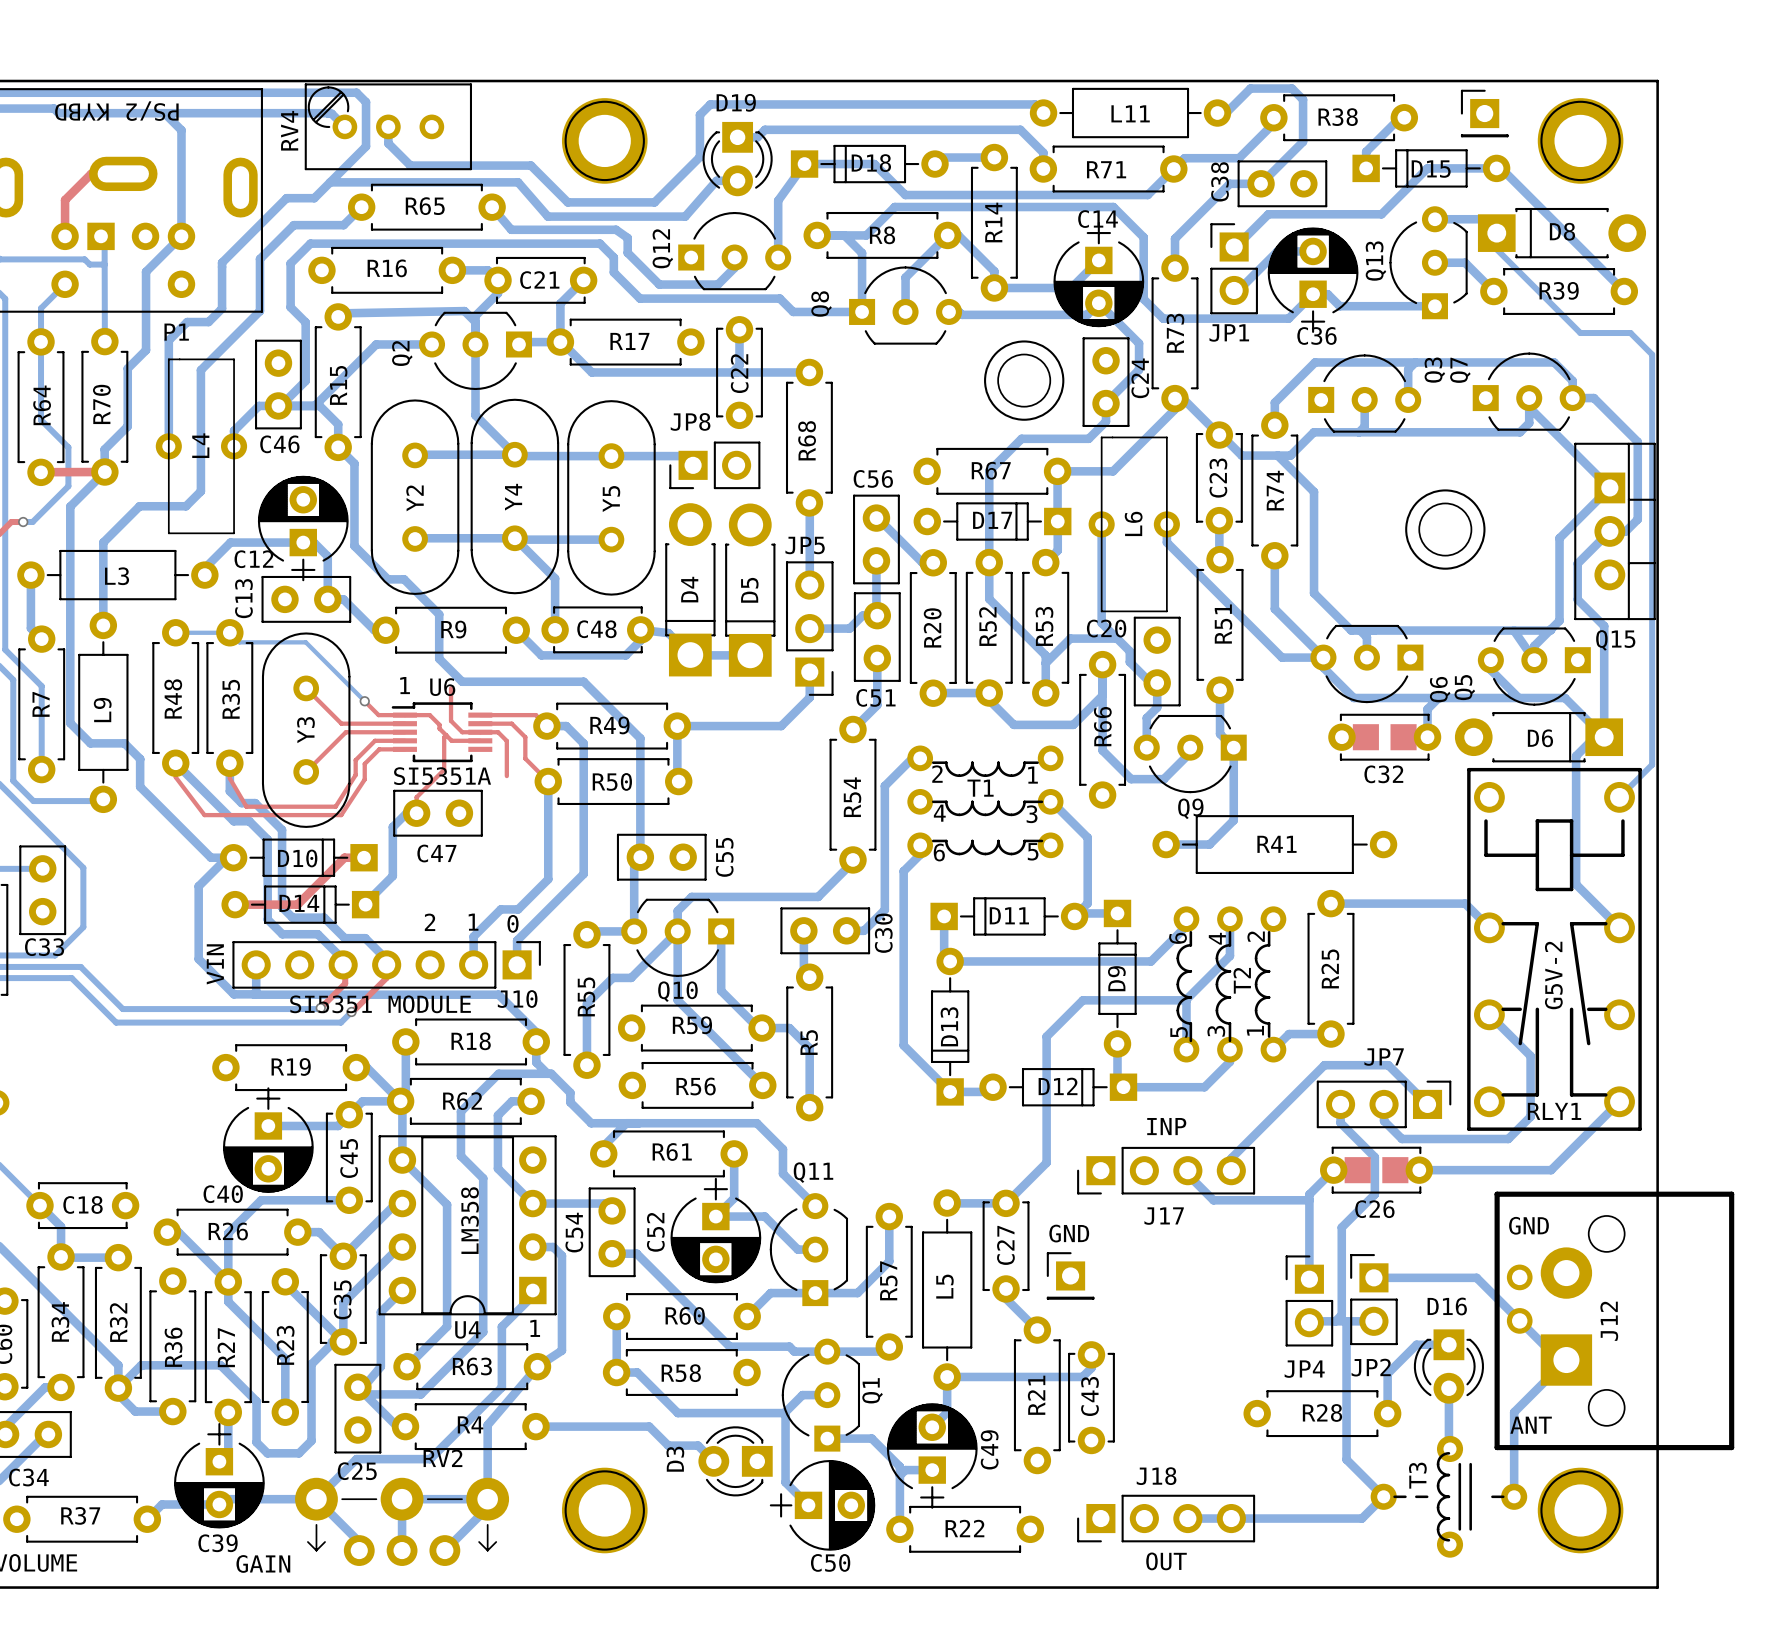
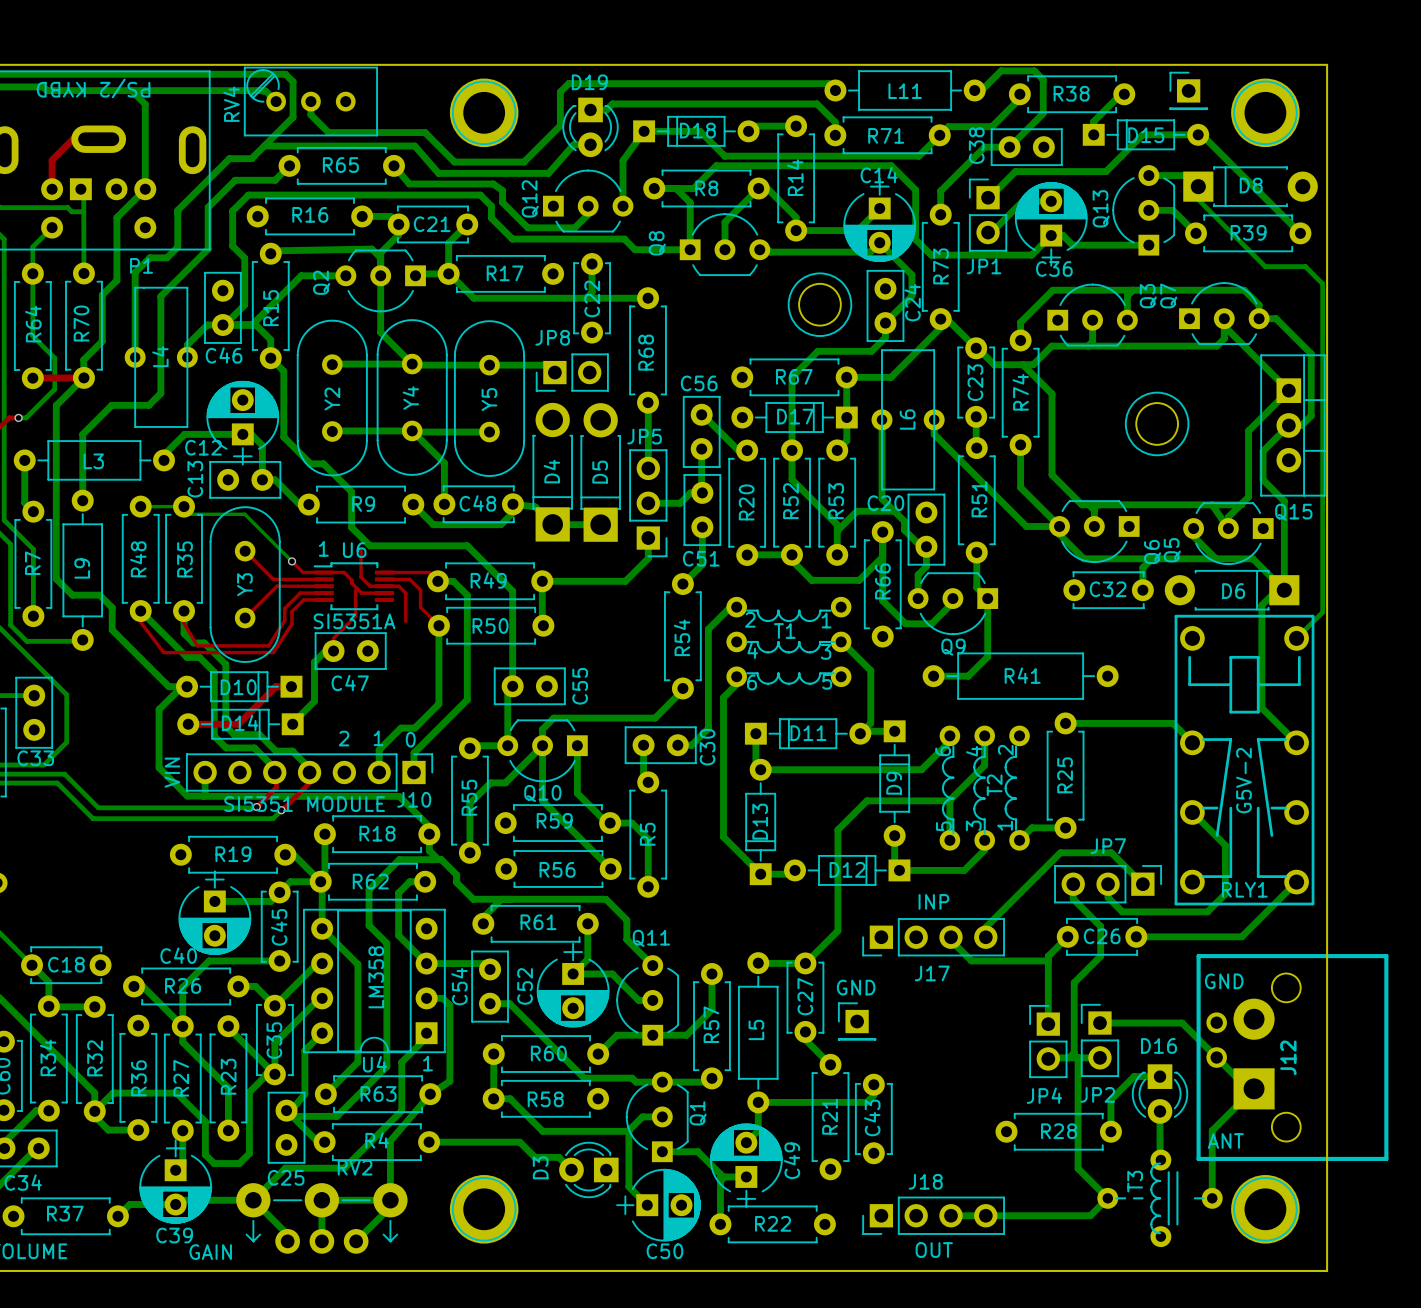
C32 footprint: [1328, 713, 1442, 761] -> [1063, 571, 1154, 609]
C32 name position: C32 (1383, 774) -> C32 (1108, 589)
C26 footprint: [1320, 1146, 1434, 1194] -> [1056, 918, 1148, 956]
C26 name position: C26 (1374, 1209) -> C26 (1102, 936)

